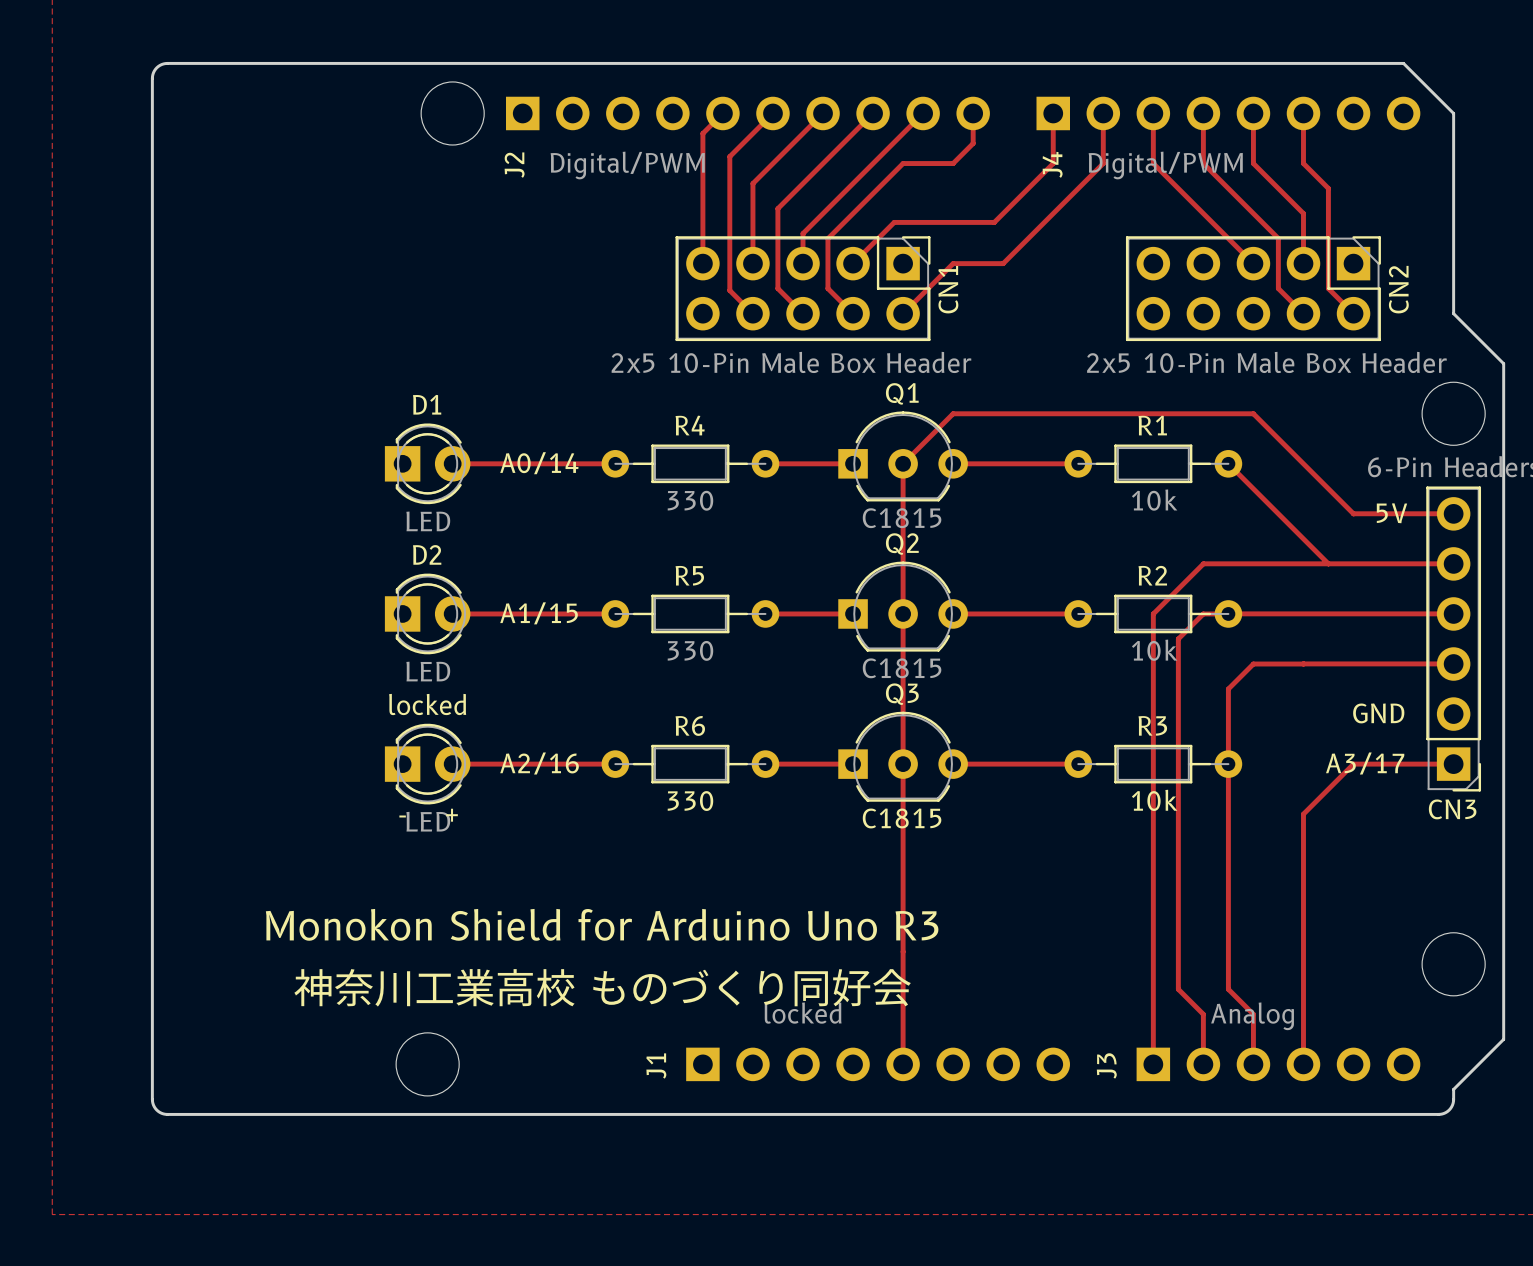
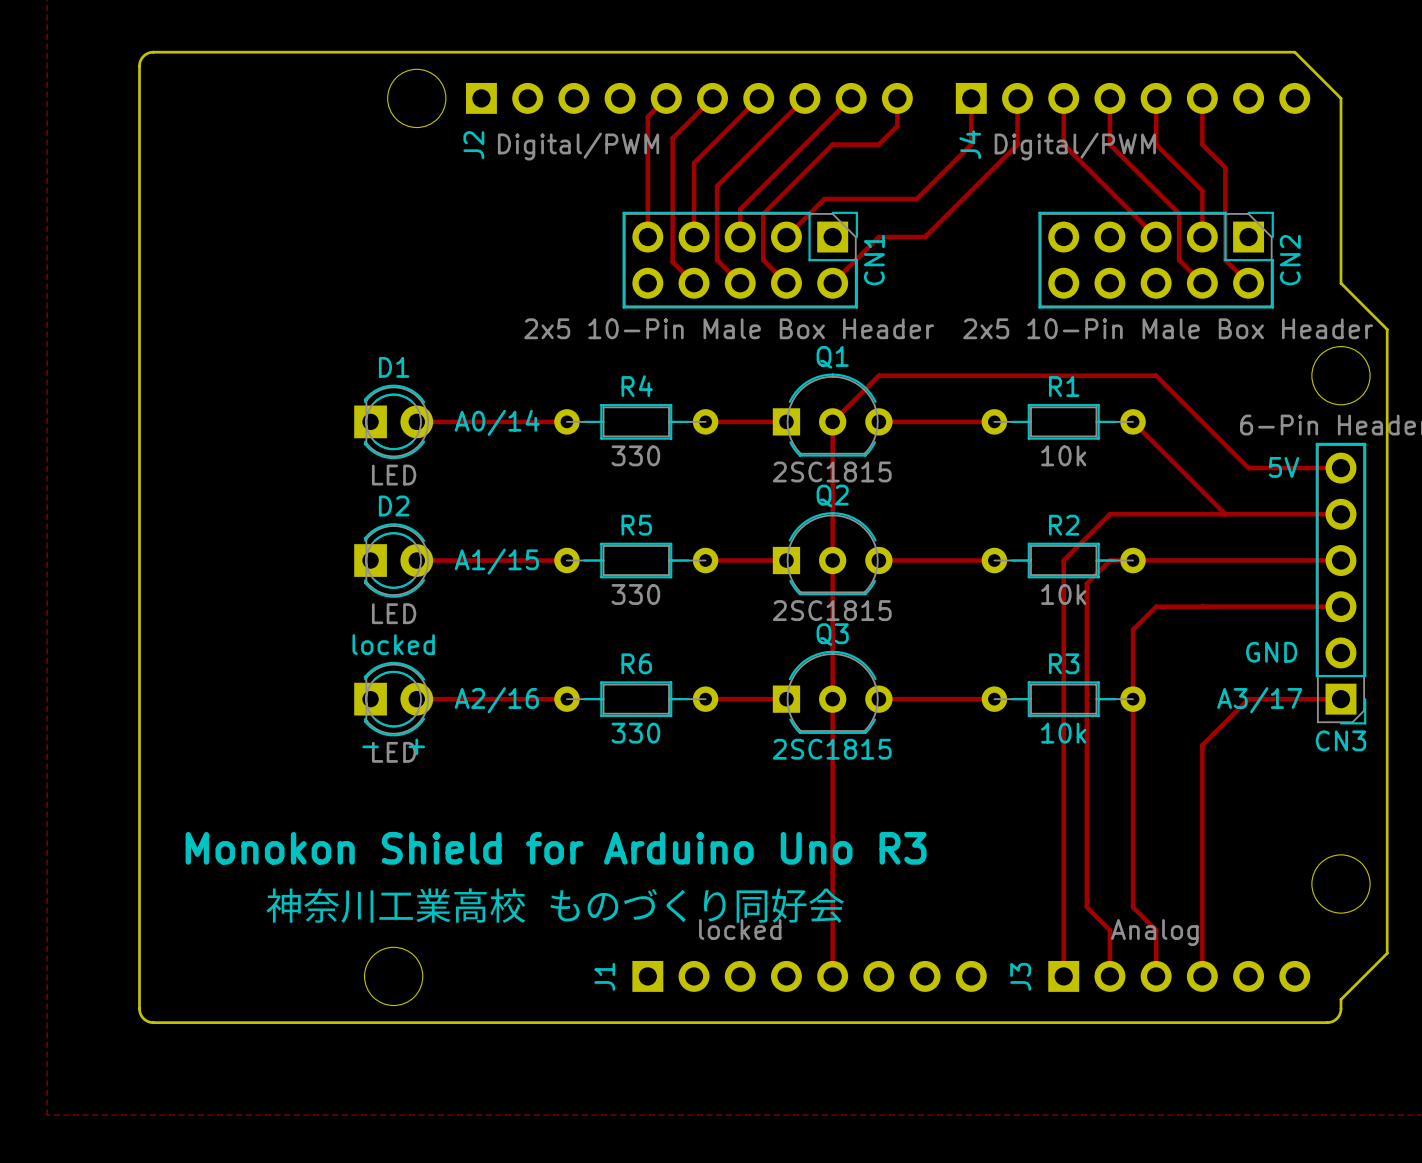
Q1 value: C1815 (902, 518) -> 2SC1815 (832, 471)
Q2 value: C1815 (902, 668) -> 2SC1815 (832, 610)
Q3 value: C1815 (902, 818) -> 2SC1815 (832, 749)

